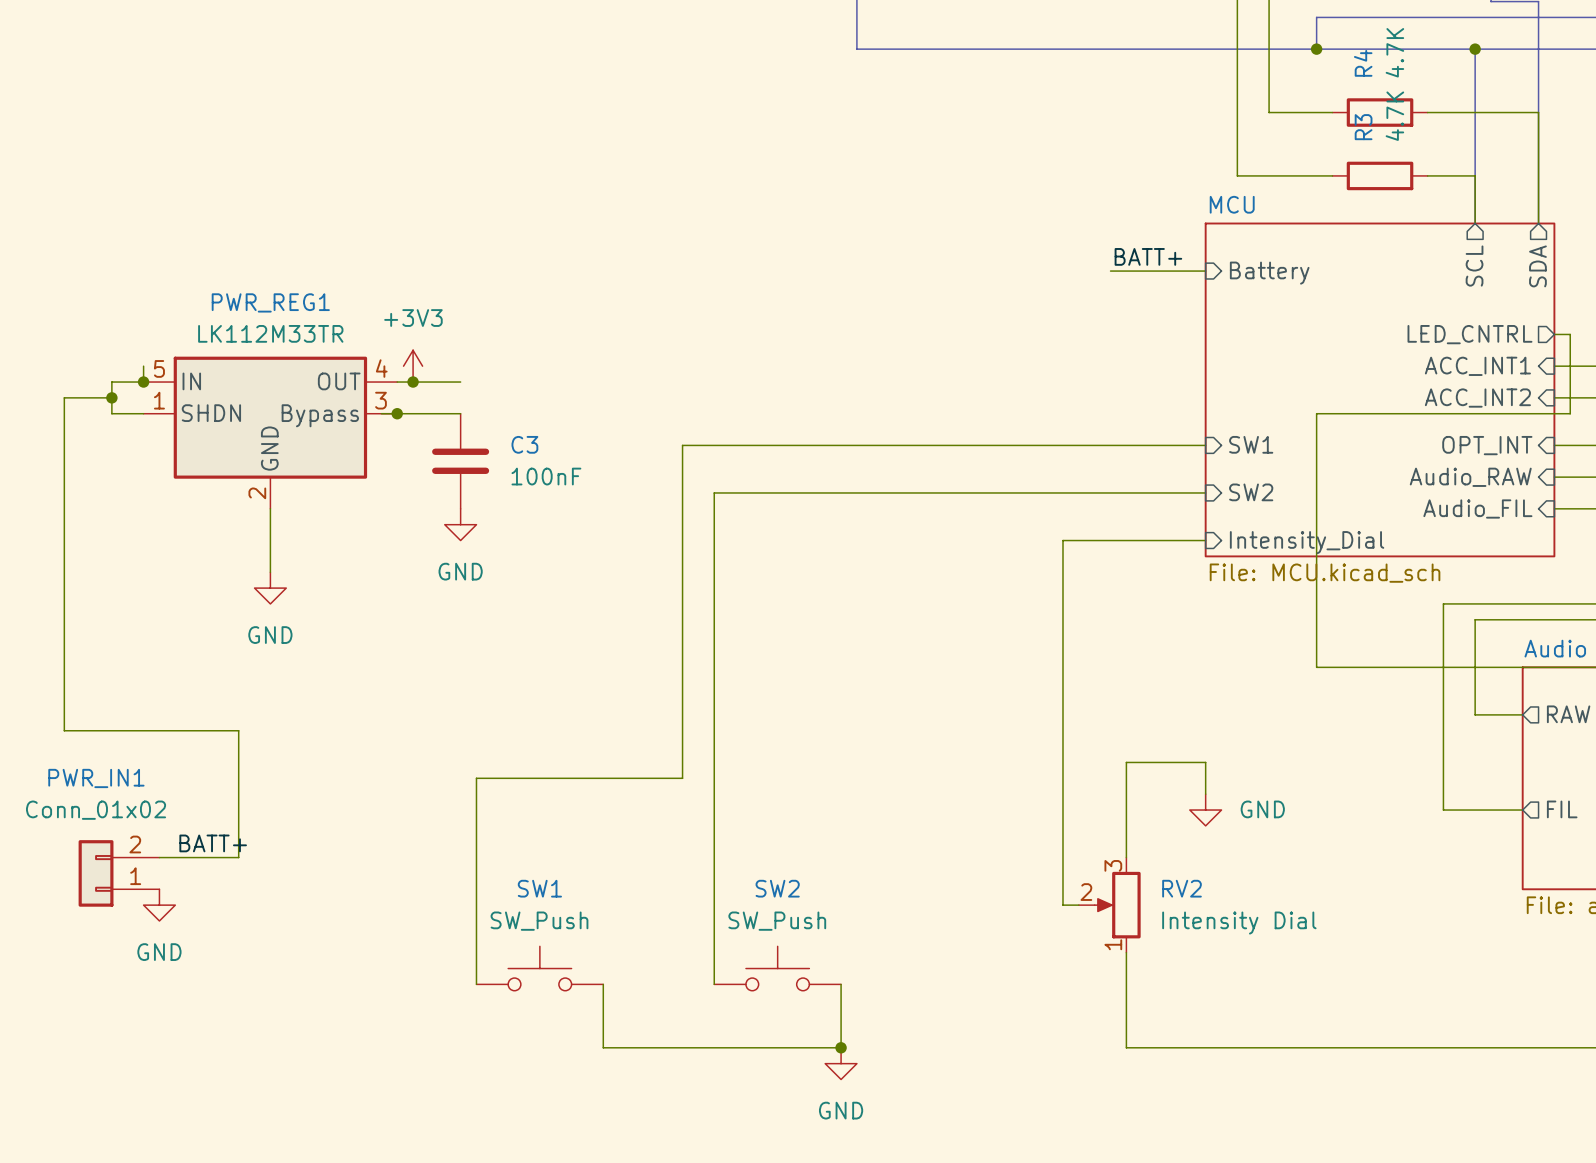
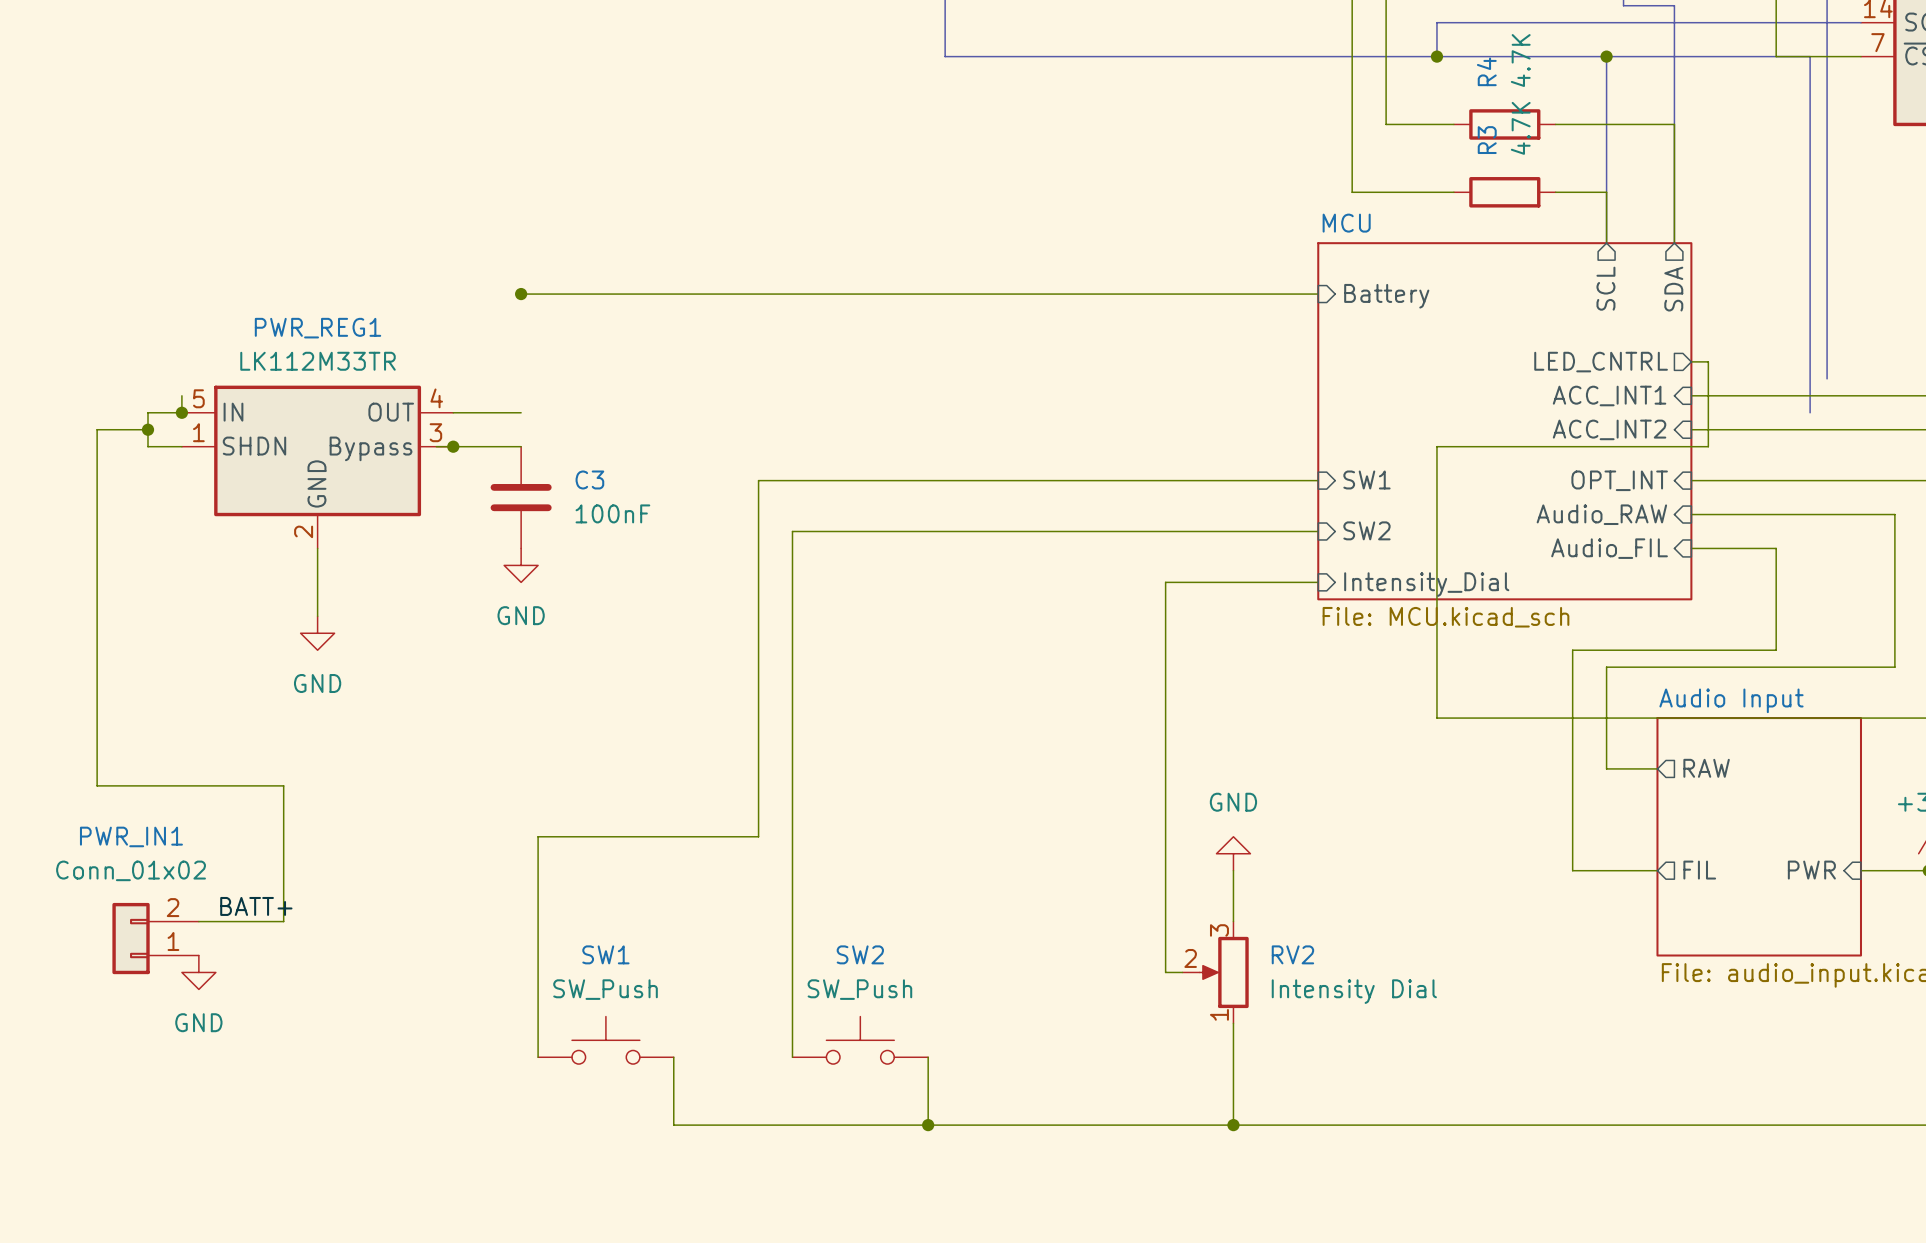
label: BATT+ (1148, 256) -> none
wire: none -> (521, 294) (1216, 294)
junction: none -> (521, 294)
power symbol: +3V3 (413, 366) -> none
junction: (413, 382) -> none
wire: (1205, 794) (1205, 762) (1126, 762) (1126, 810) -> none
power symbol text position: GND (1262, 809) -> GND (1233, 802)
power symbol rotation: 0° (1205, 810) -> 180° (1233, 853)
power symbol position: GND (1205, 810) -> GND (1233, 853)
wire: none -> (928, 1125) (1233, 1125)
junction: none -> (1233, 1125)
power symbol: GND (841, 1063) -> none

